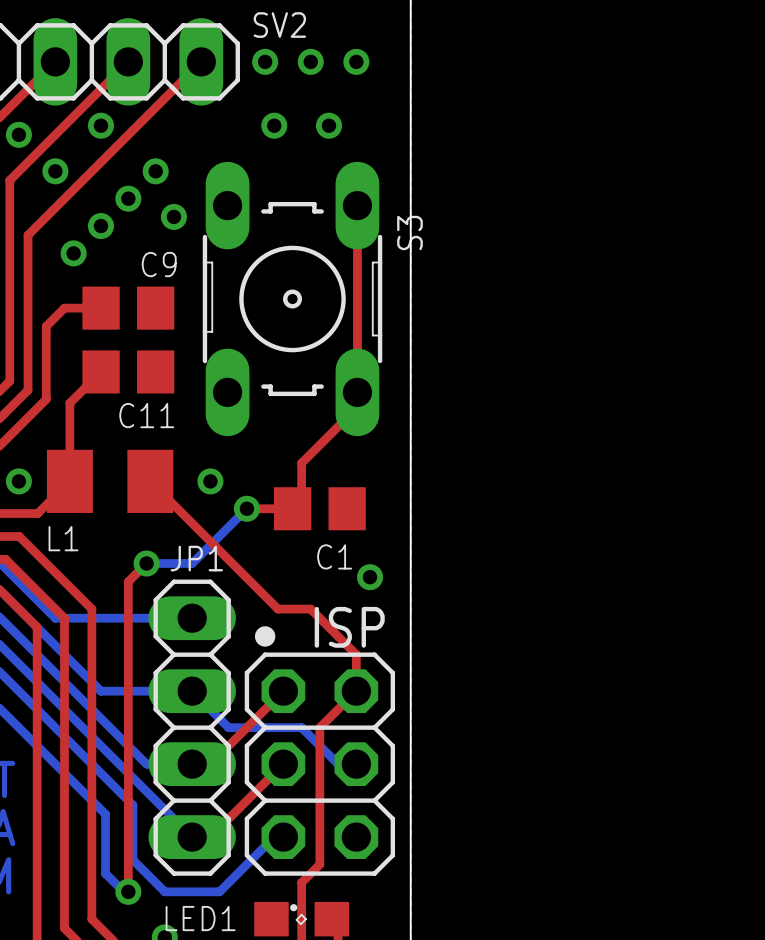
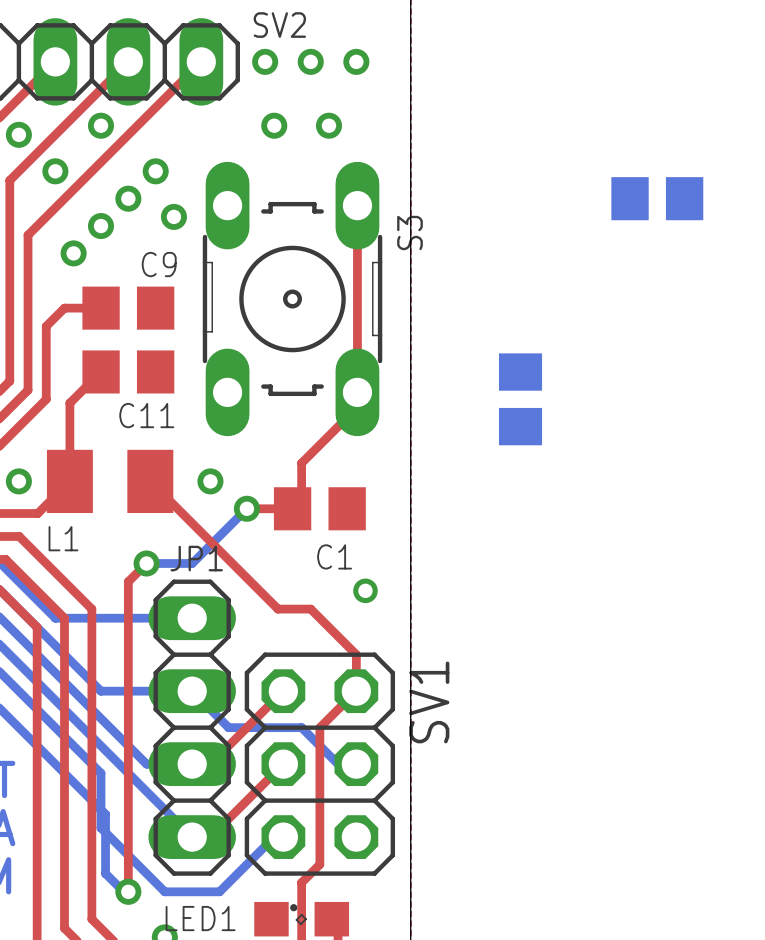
part: none -> (657, 198)
part: none -> (520, 399)
via position: (370, 577) -> (365, 590)
drawing: [254, 626, 276, 647] -> none
ISP name: ISP (349, 627) -> SV1 (429, 702)
bottom track: (100, 773) (132, 805) (132, 859) -> (100, 773) (100, 827) (132, 859)

